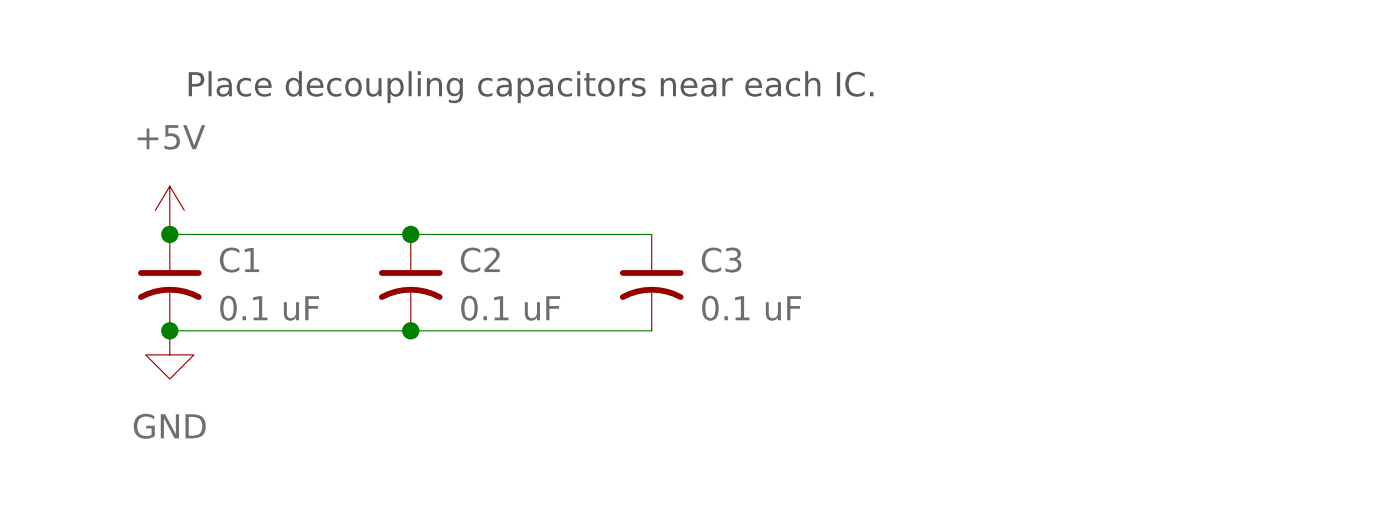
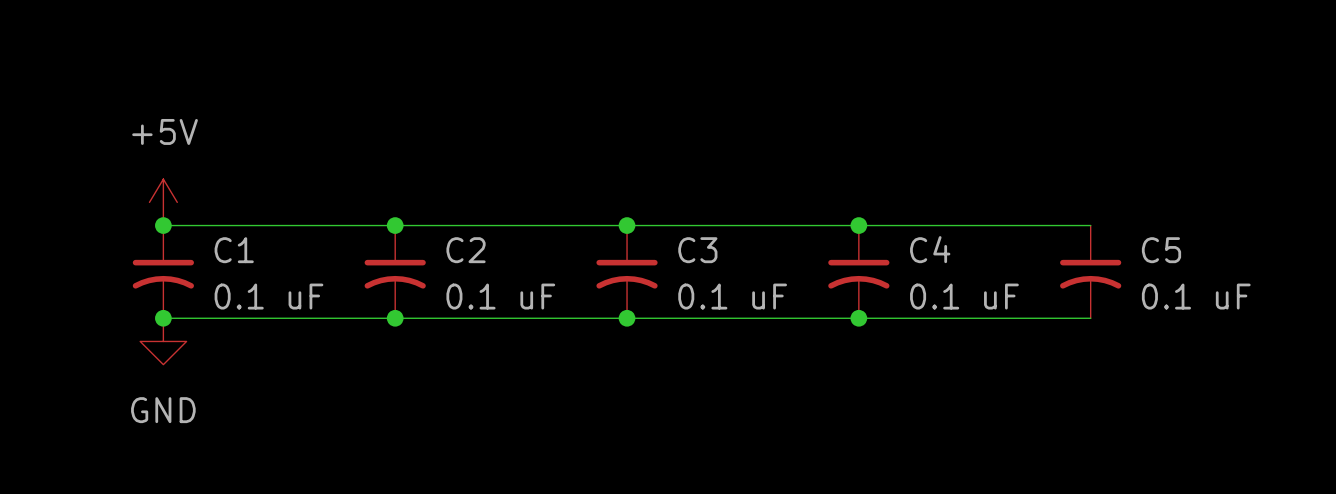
text: Place decoupling capacitors near each IC. (531, 87) -> none
wire: none -> (627, 225) (1090, 225)
junction: none -> (627, 225)
junction: none -> (858, 225)
C4: none -> 0.1 uF (858, 271)
C5: none -> 0.1 uF (1090, 271)
wire: none -> (627, 318) (1090, 318)
junction: none -> (627, 318)
junction: none -> (858, 318)

